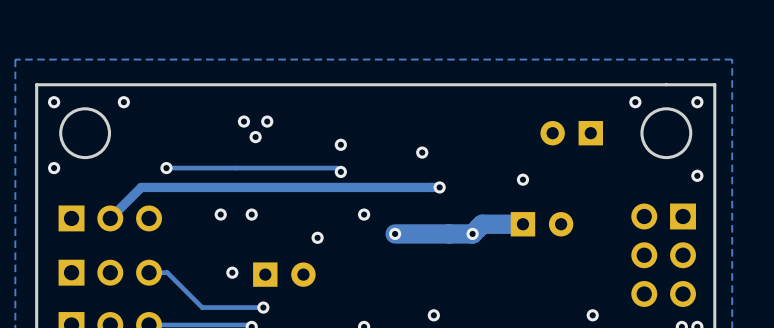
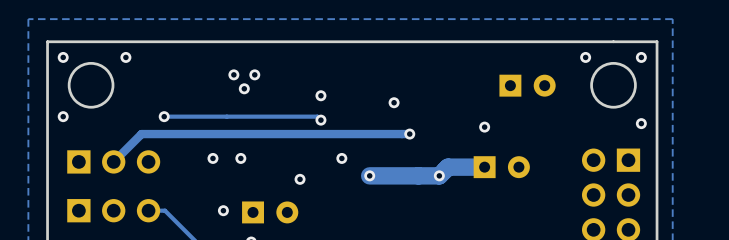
part rotation: 0° (571, 133) -> 180° (527, 85)

